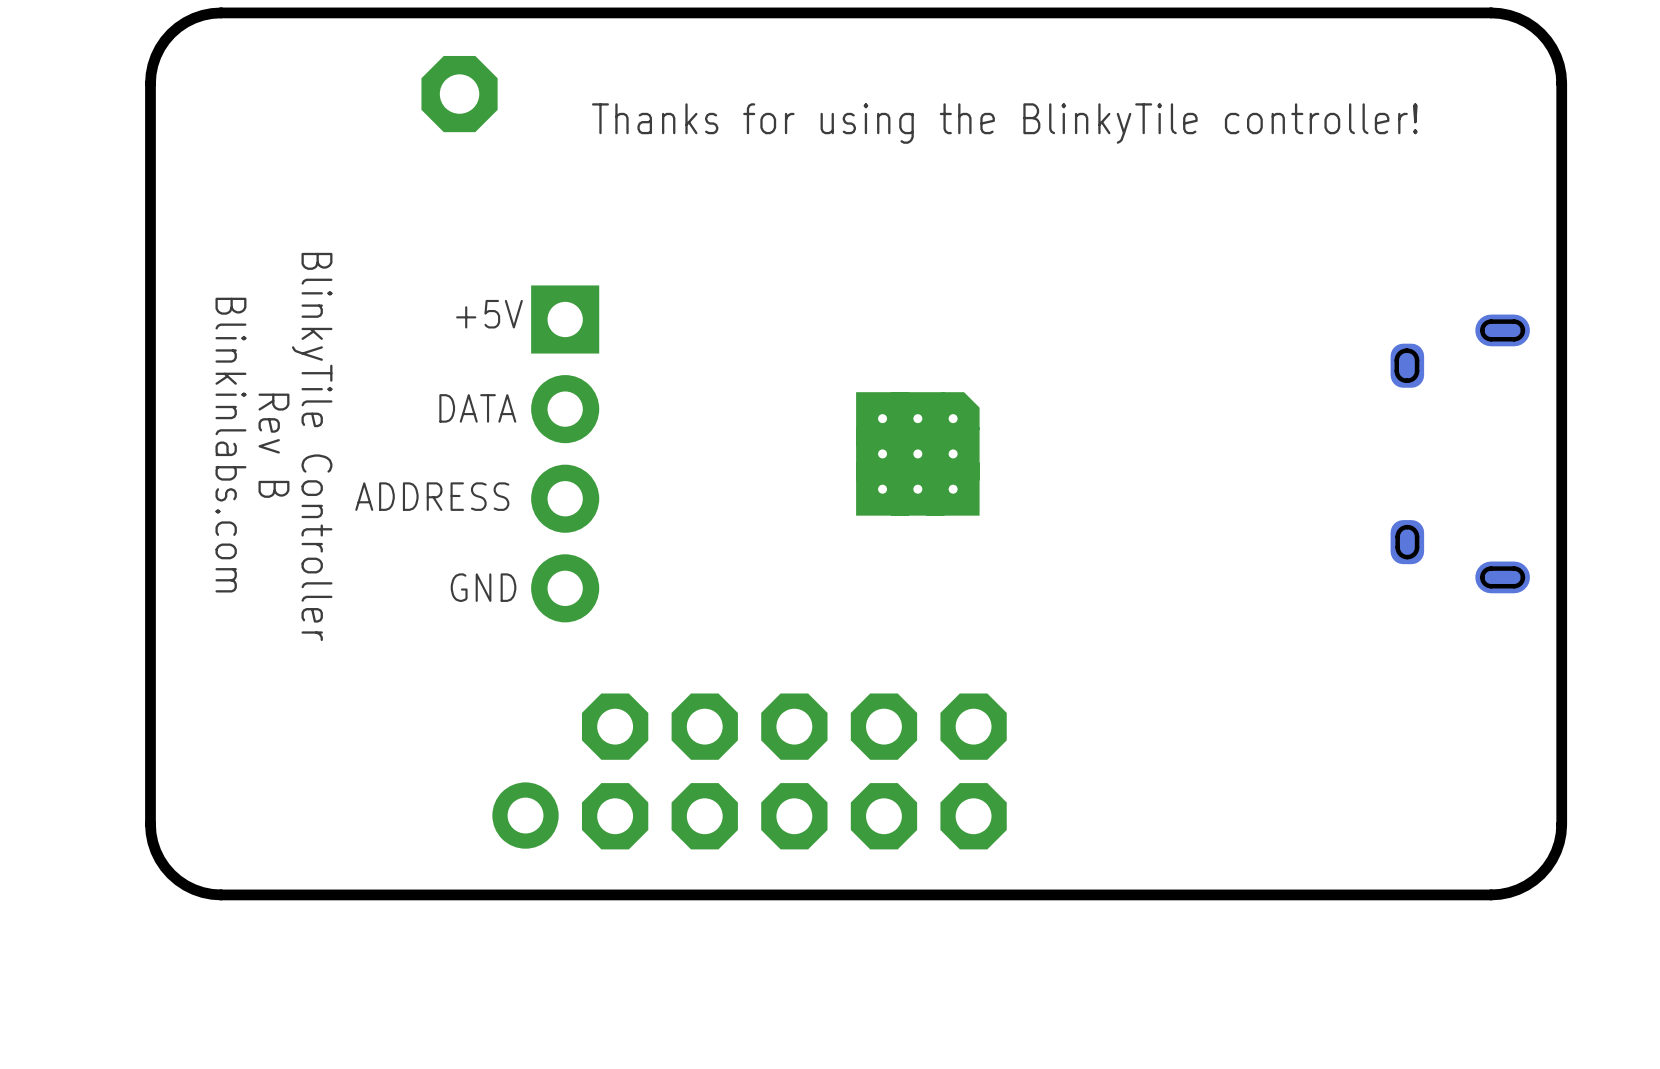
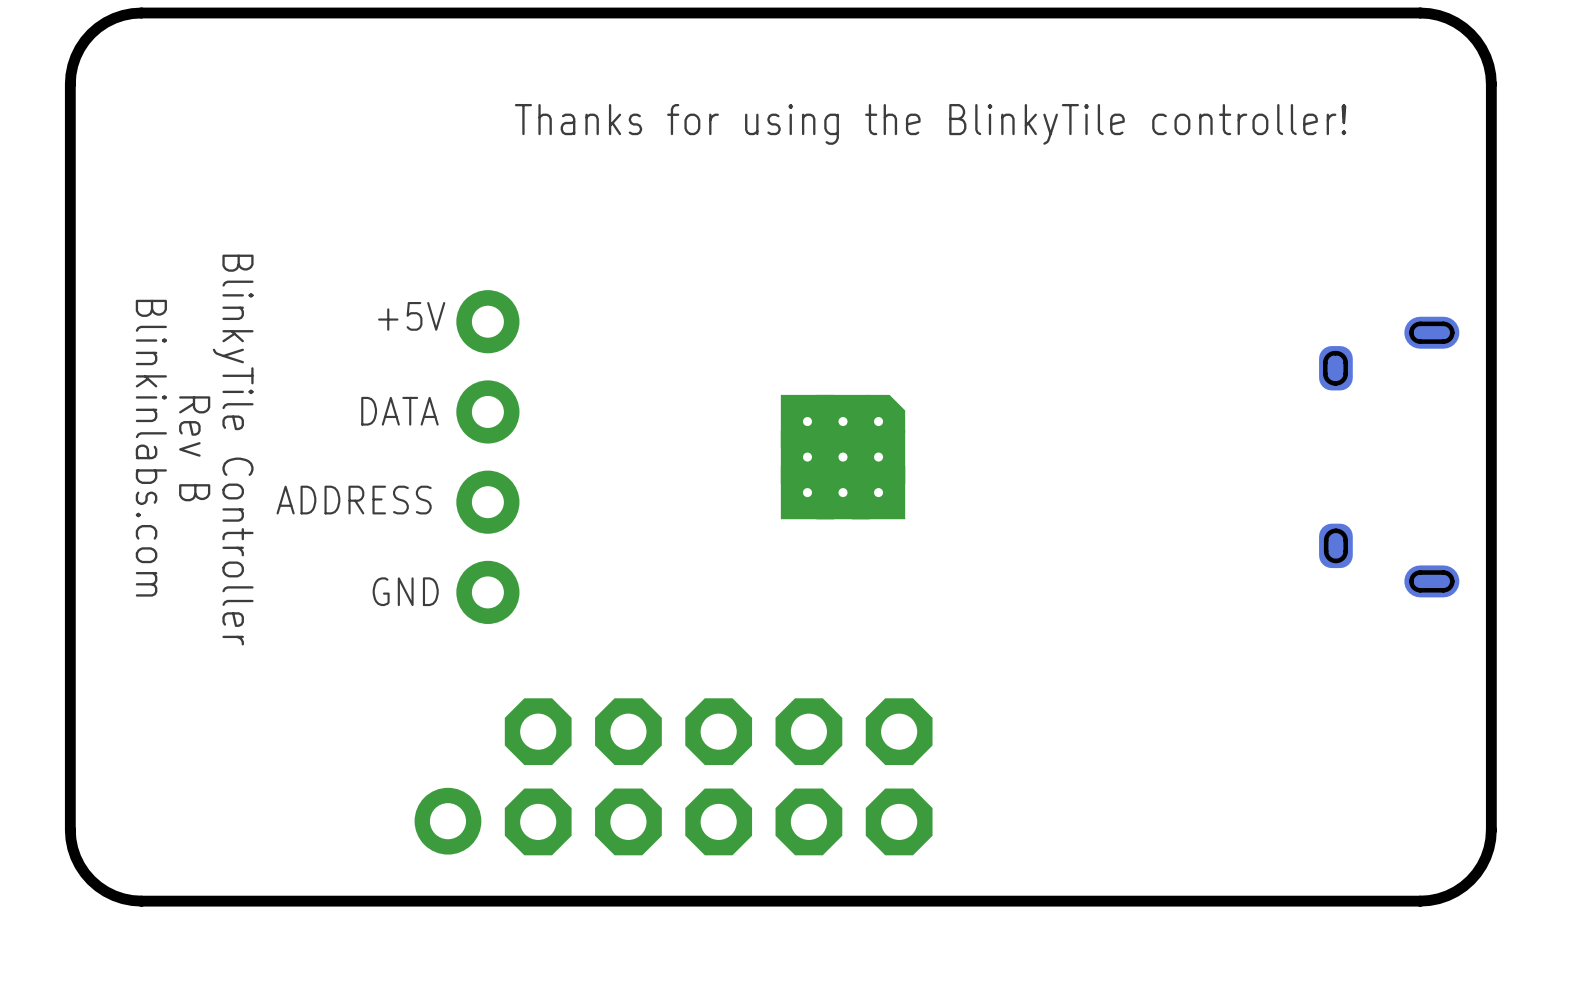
part: (459, 94) -> none
part footprint: [531, 285, 600, 623] -> [456, 290, 520, 625]

